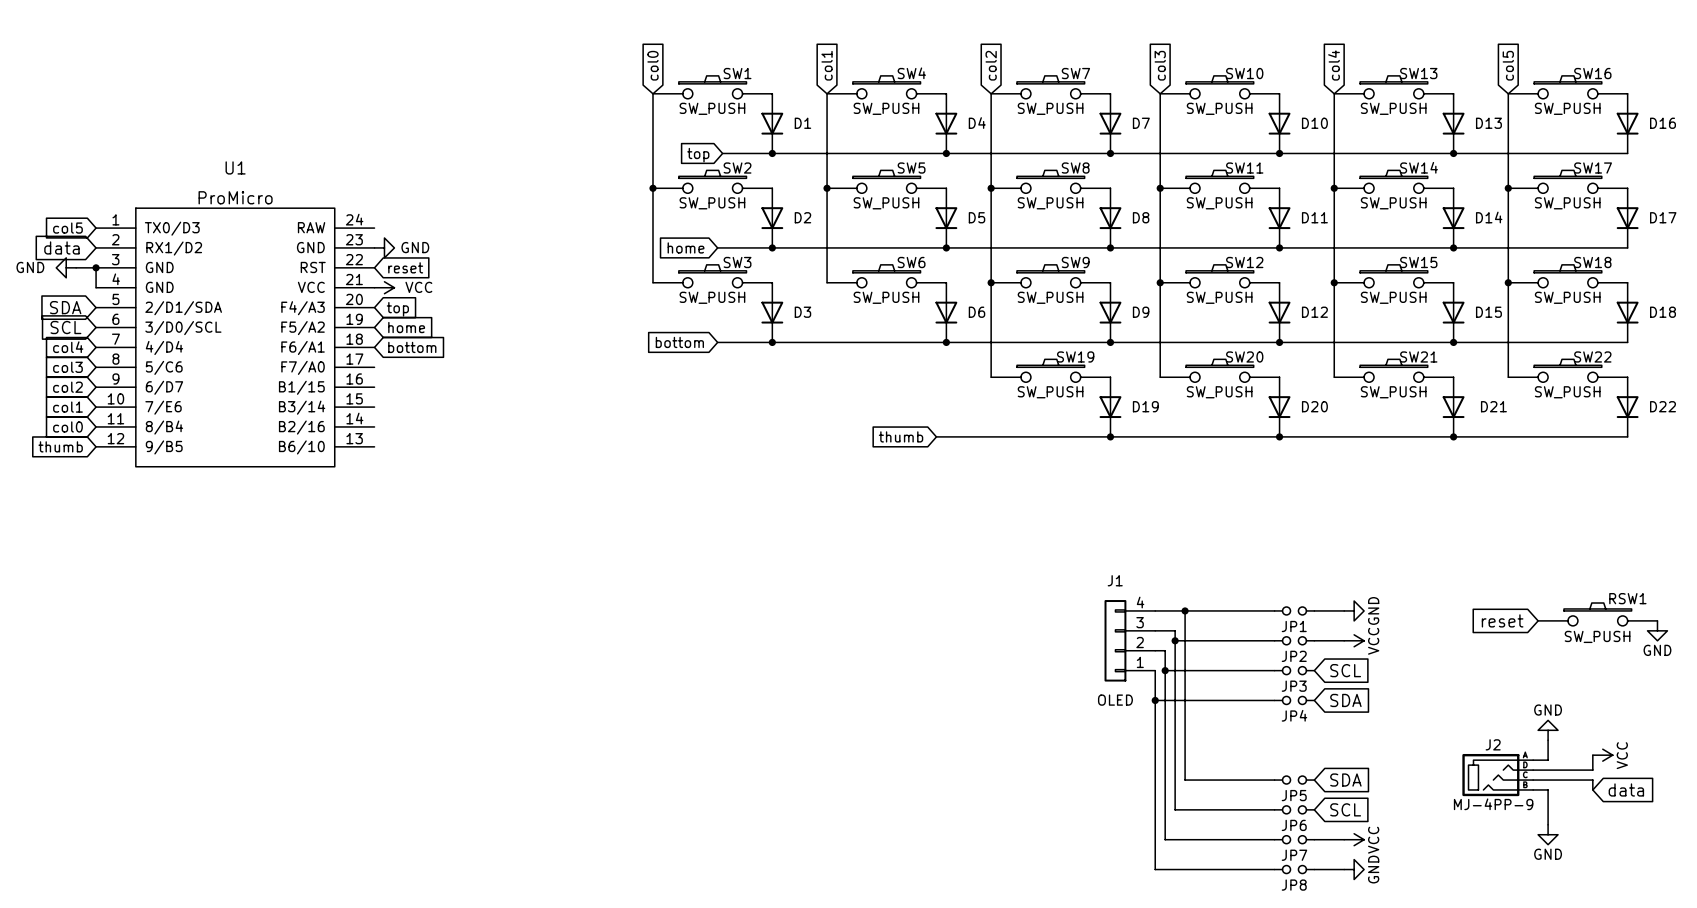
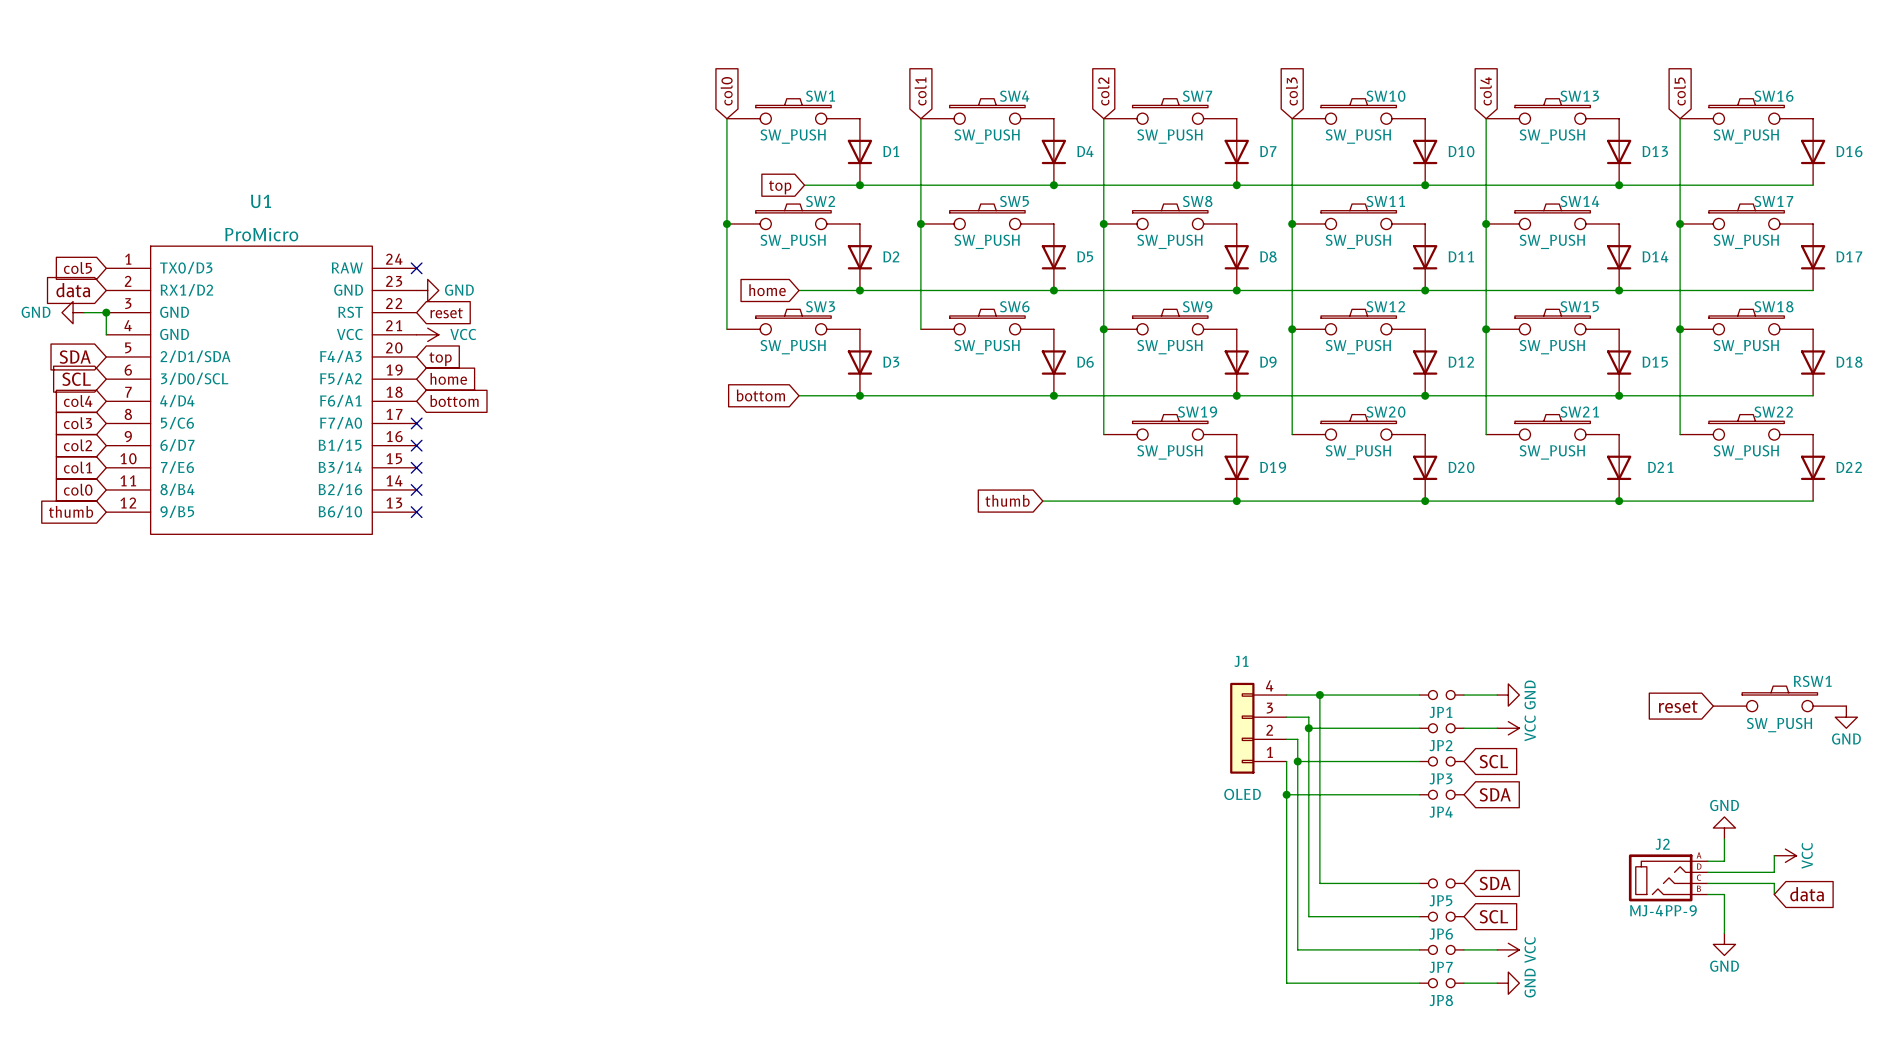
no-connect mark: none -> (416, 268)
no-connect mark: none -> (416, 423)
no-connect mark: none -> (416, 445)
no-connect mark: none -> (416, 467)
no-connect mark: none -> (416, 489)
no-connect mark: none -> (416, 512)

